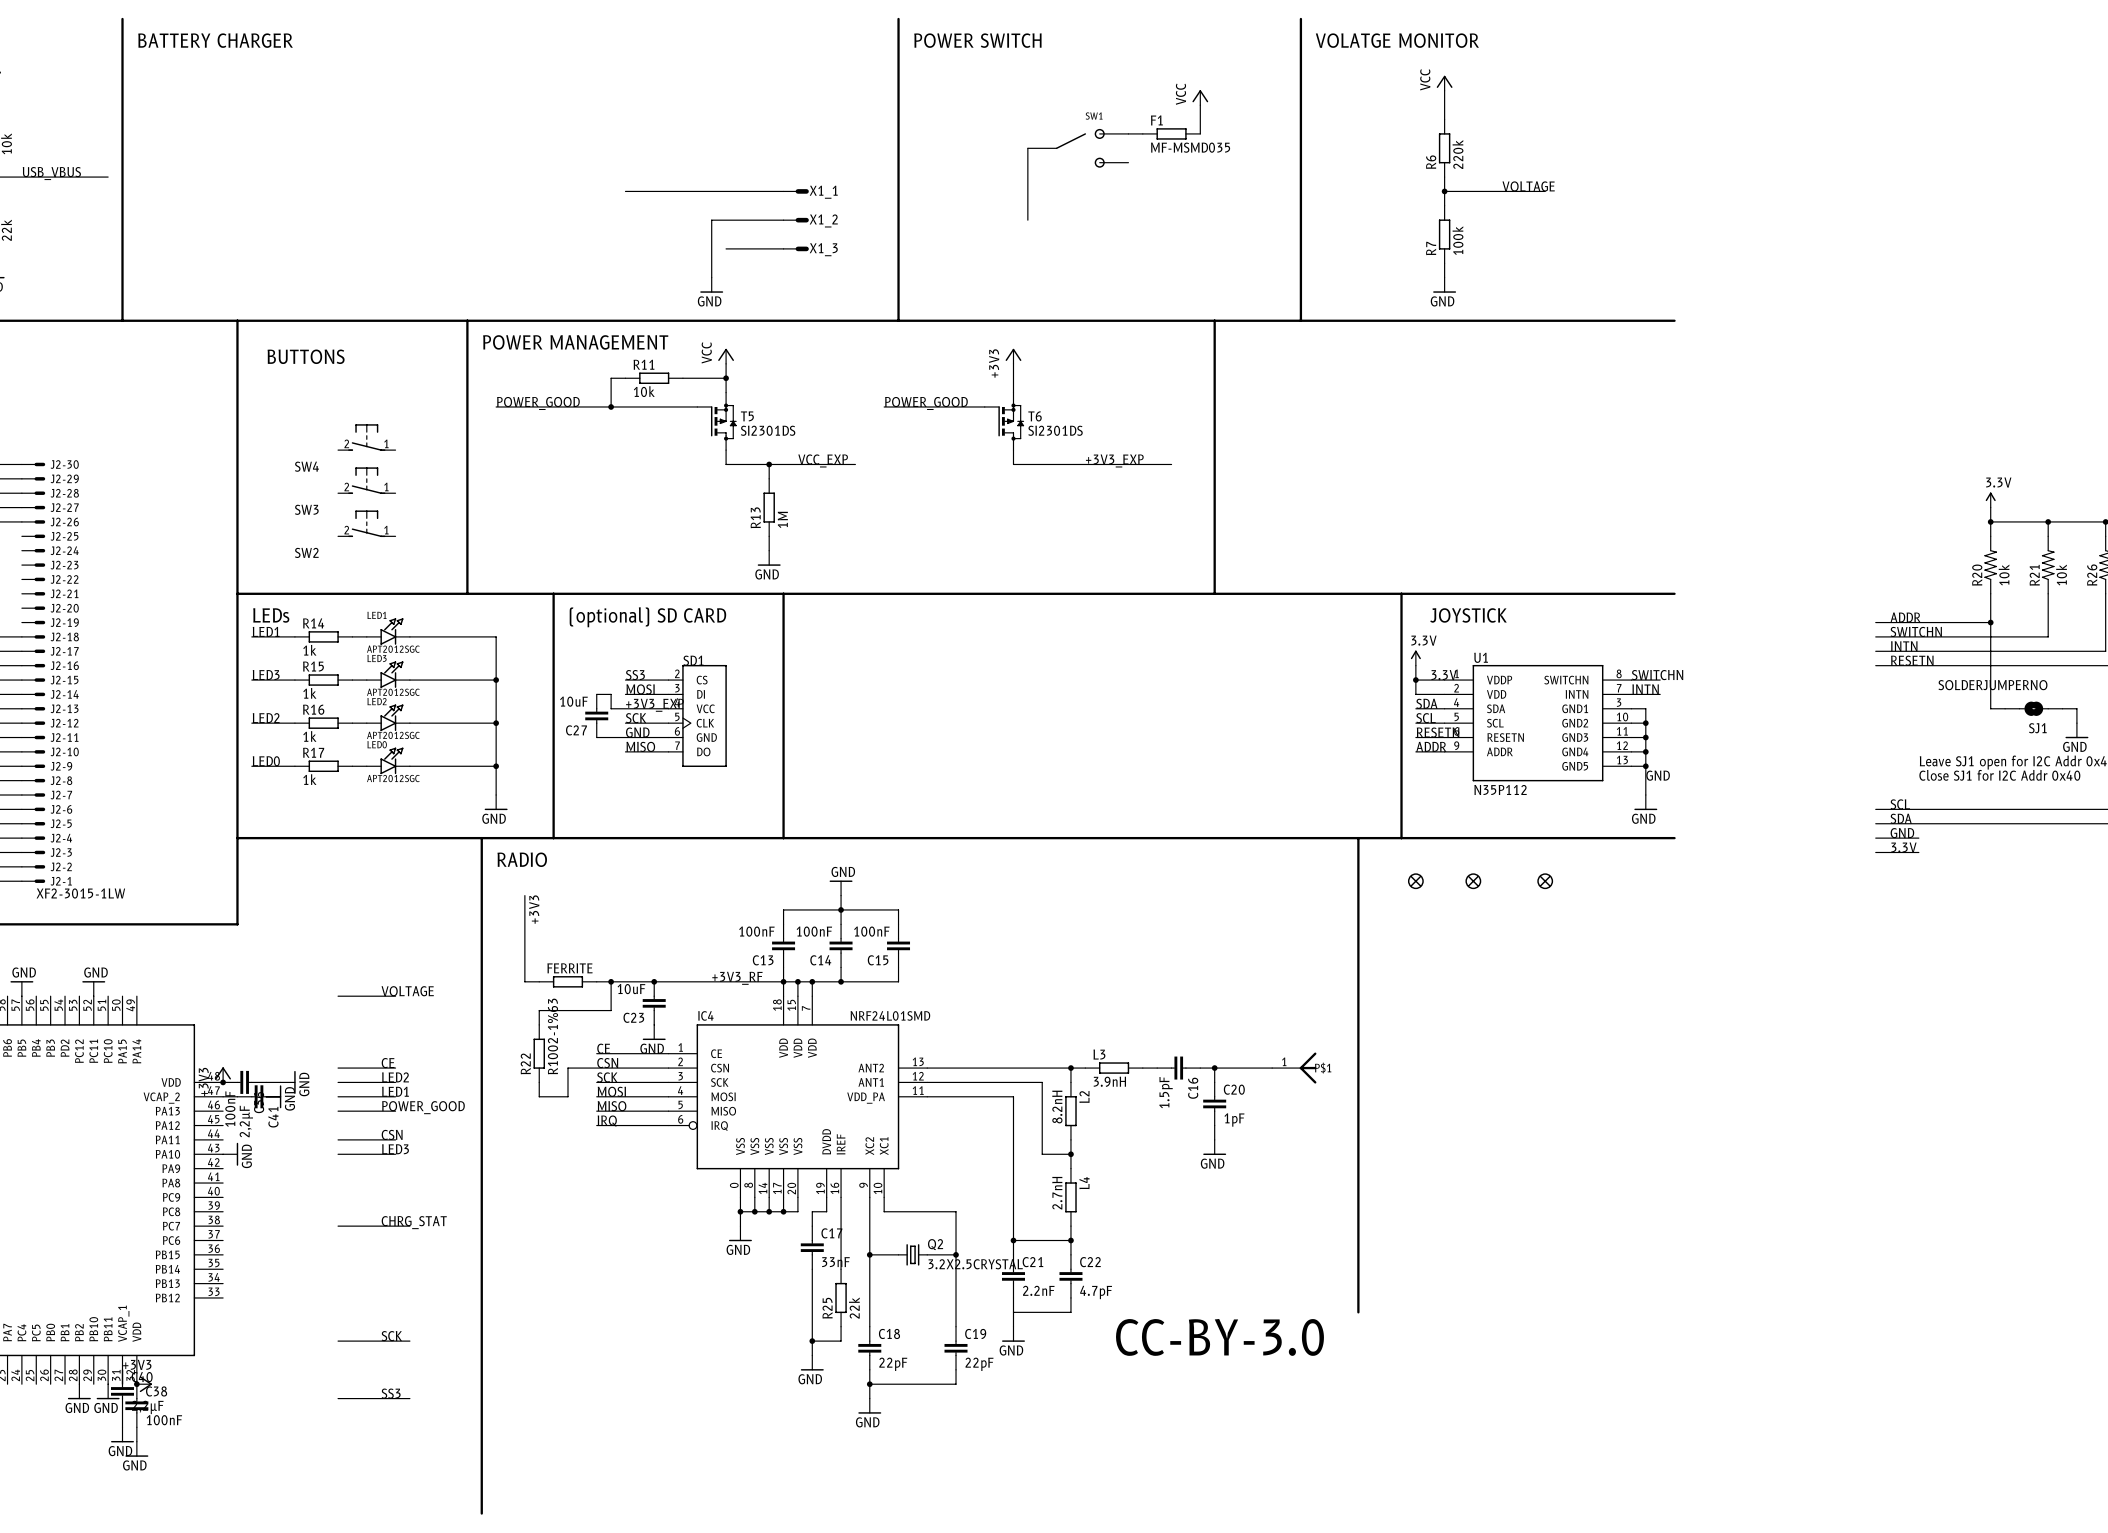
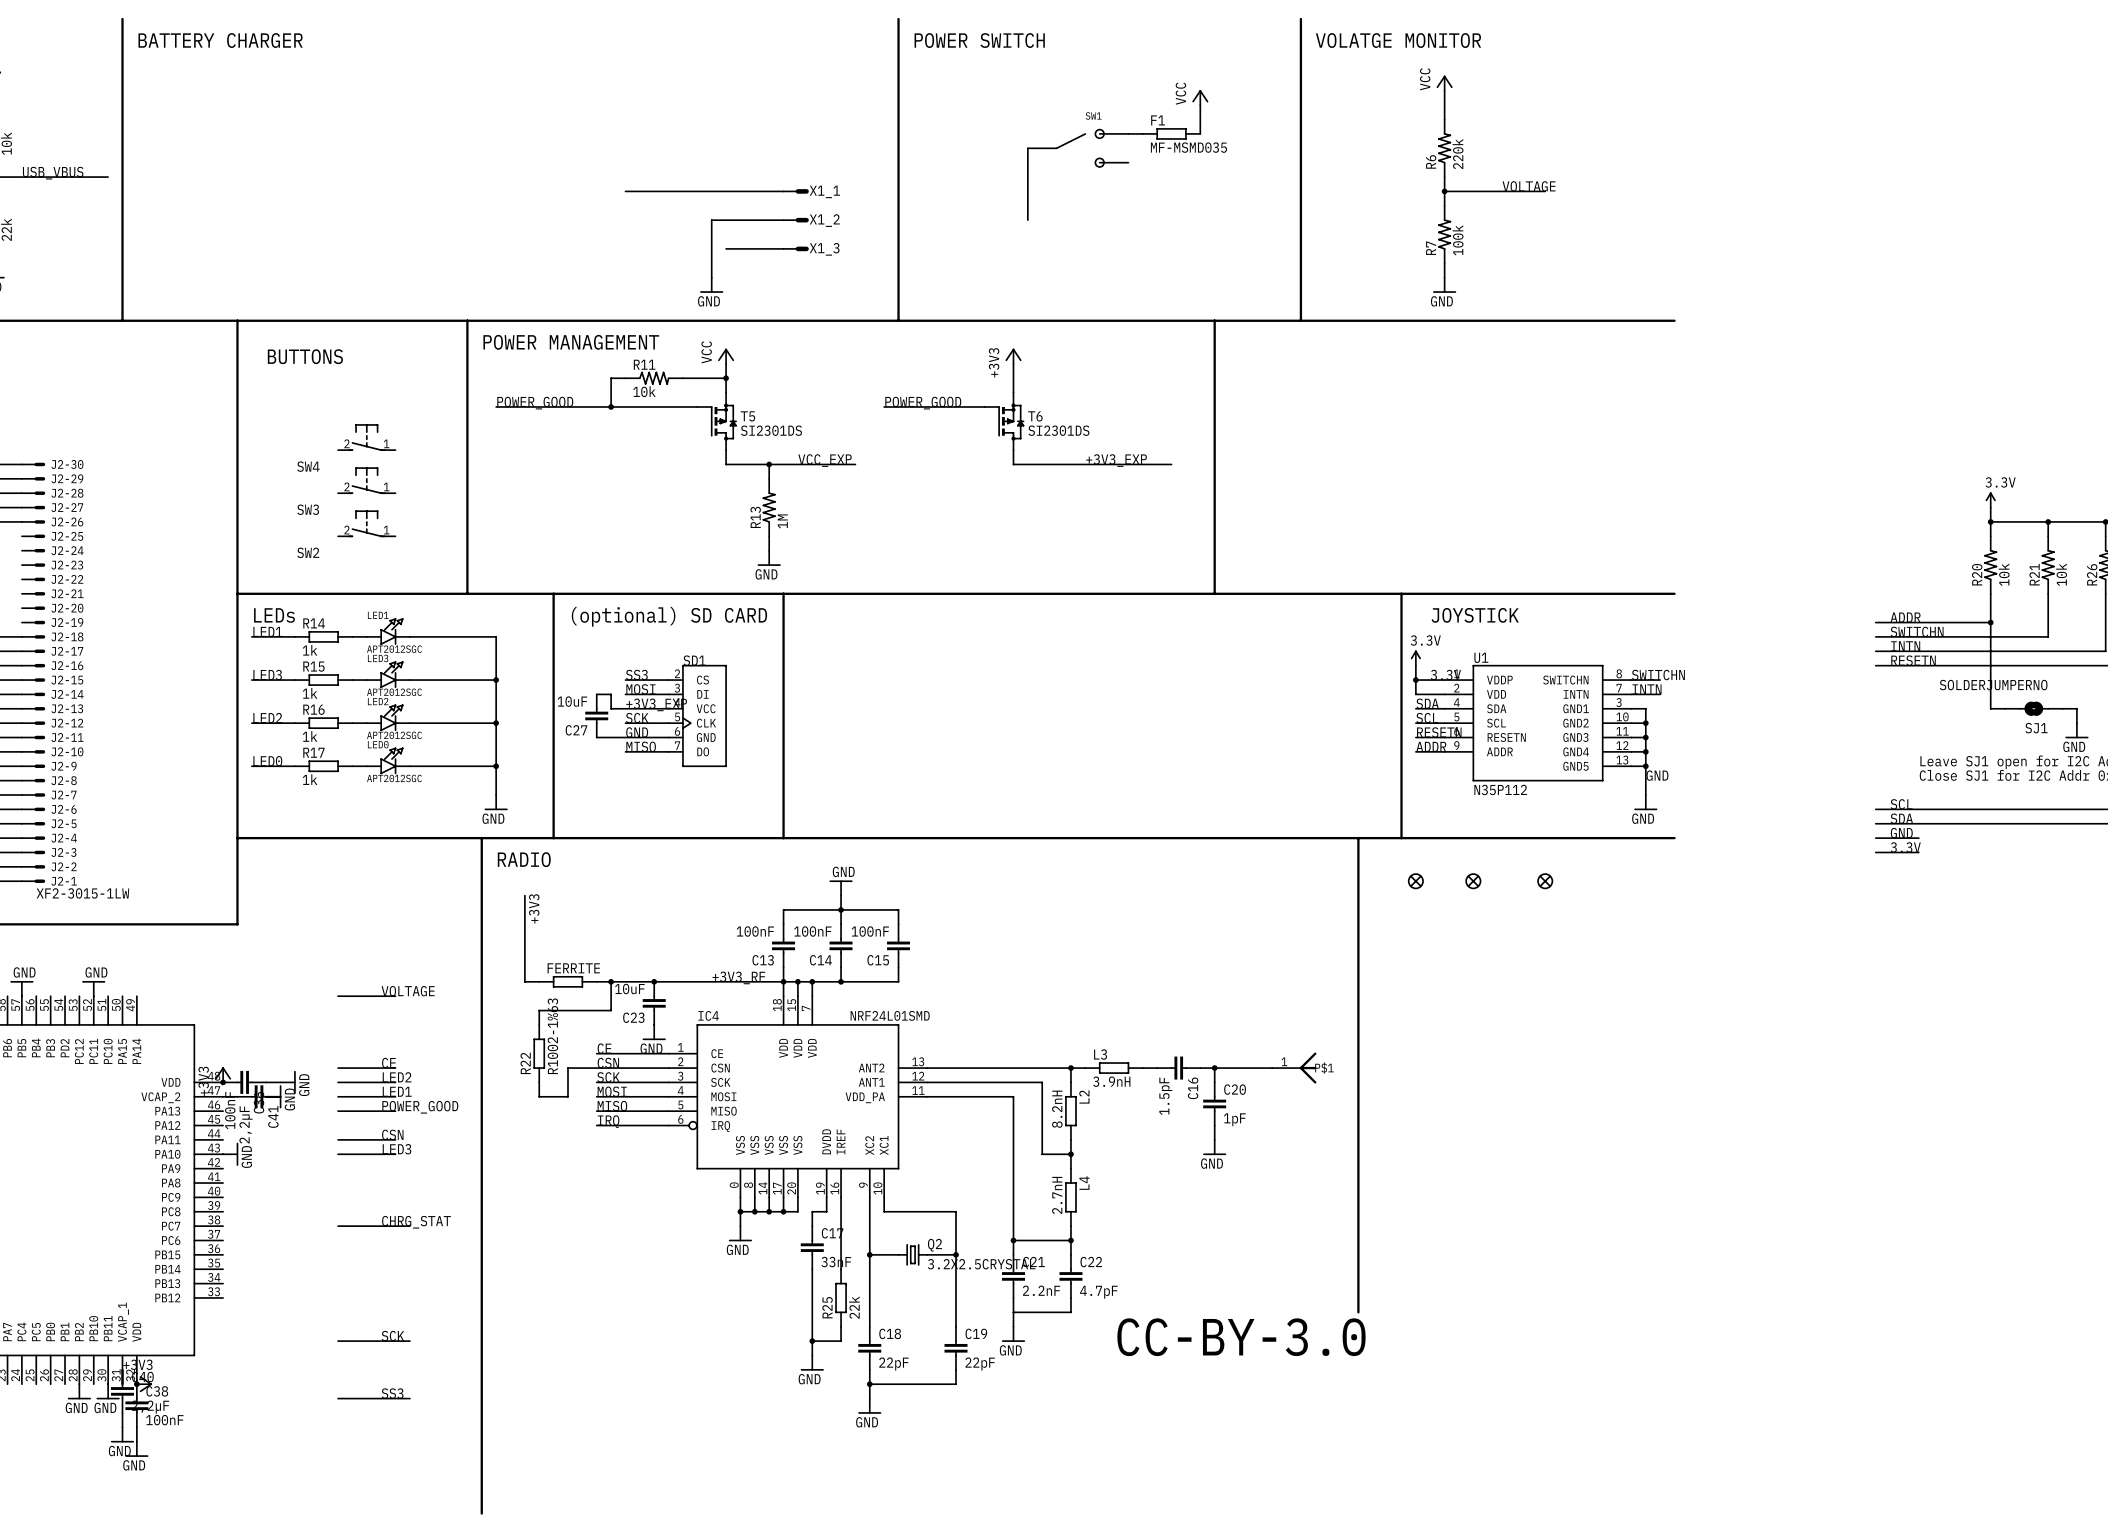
R6 symbol: [1438, 119, 1451, 178] -> [1438, 119, 1451, 178]
R7 symbol: [1438, 205, 1451, 264] -> [1438, 205, 1451, 264]
R11 symbol: [625, 372, 683, 385] -> [625, 372, 683, 385]
R13 symbol: [763, 478, 775, 537] -> [763, 478, 776, 537]

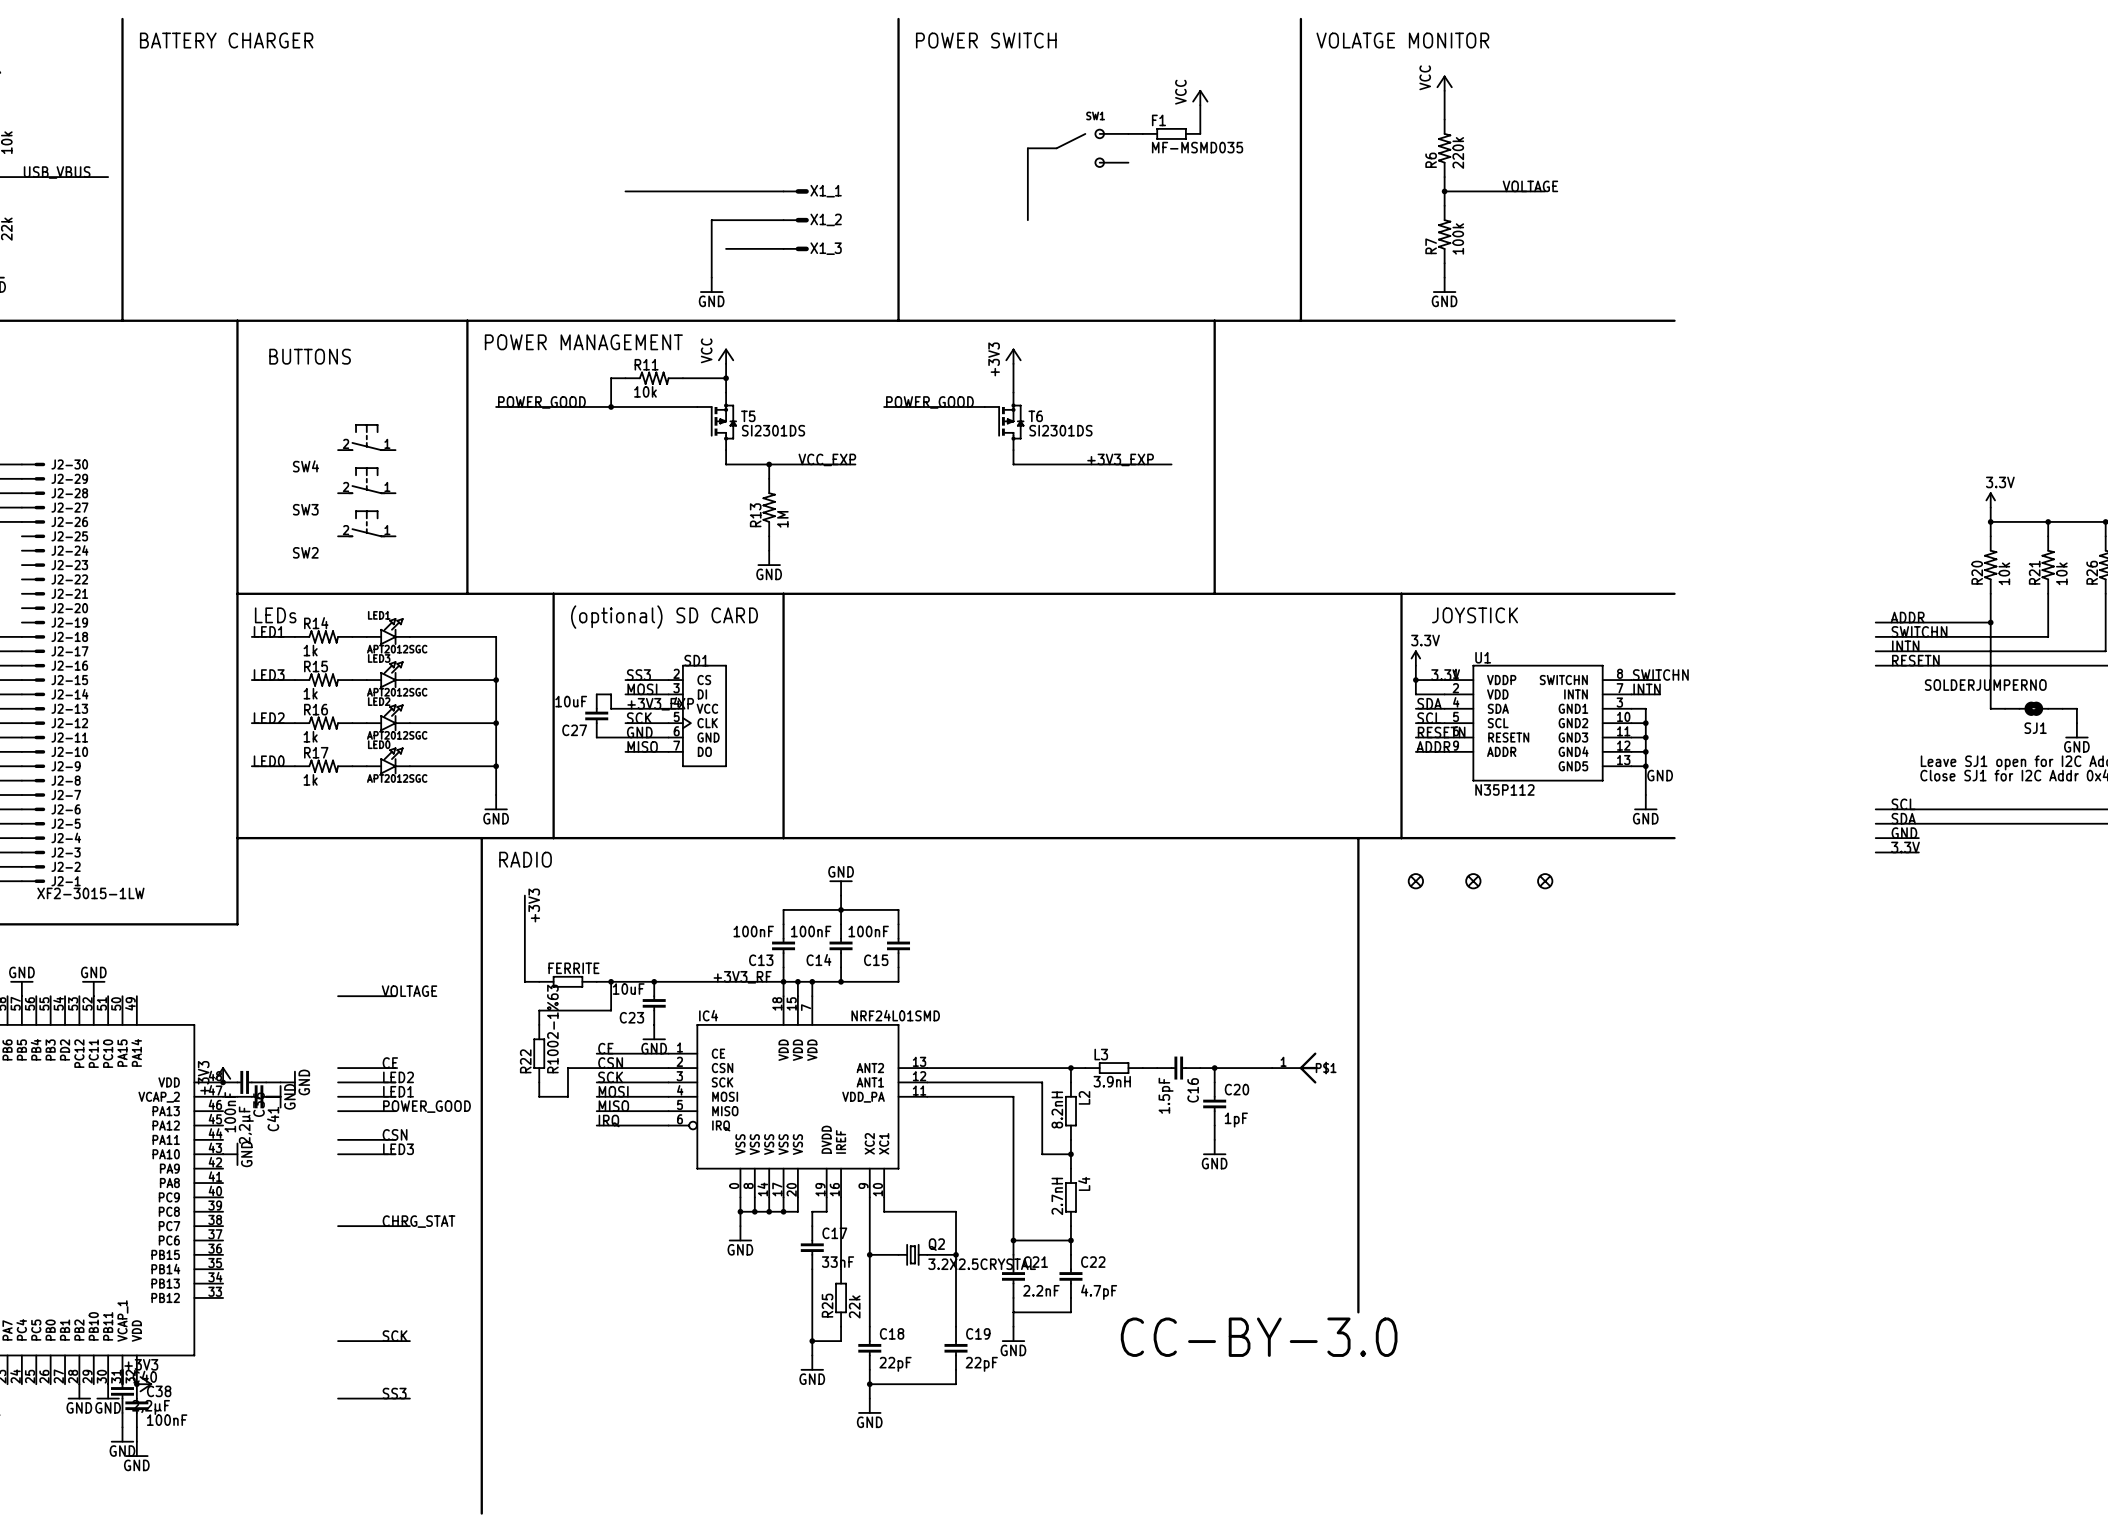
R14 symbol: [294, 631, 353, 643] -> [294, 630, 353, 644]
R15 symbol: [294, 674, 353, 686] -> [294, 673, 353, 687]
R16 symbol: [294, 717, 353, 729] -> [294, 716, 353, 730]
R17 symbol: [294, 760, 353, 773] -> [294, 760, 353, 773]

